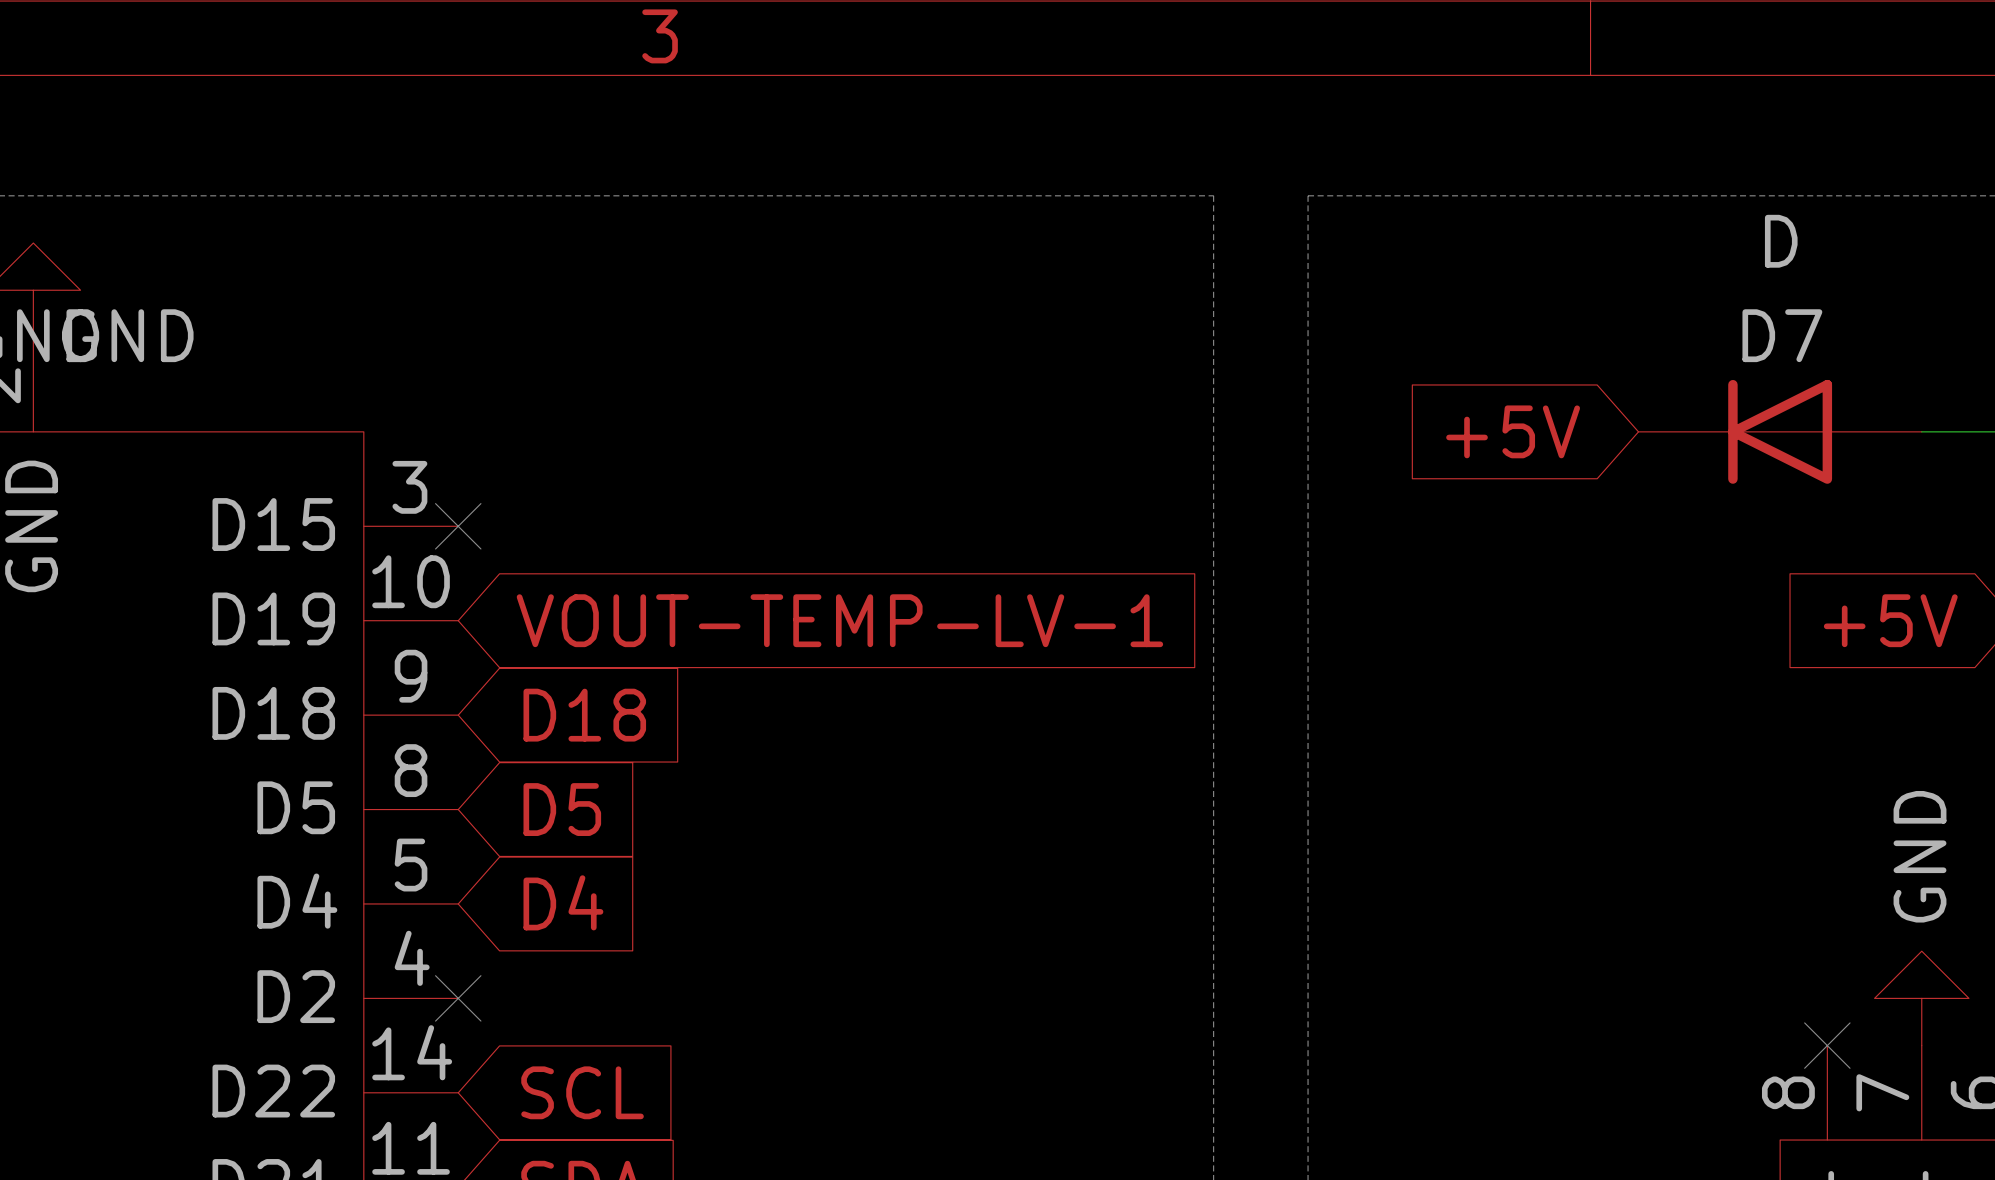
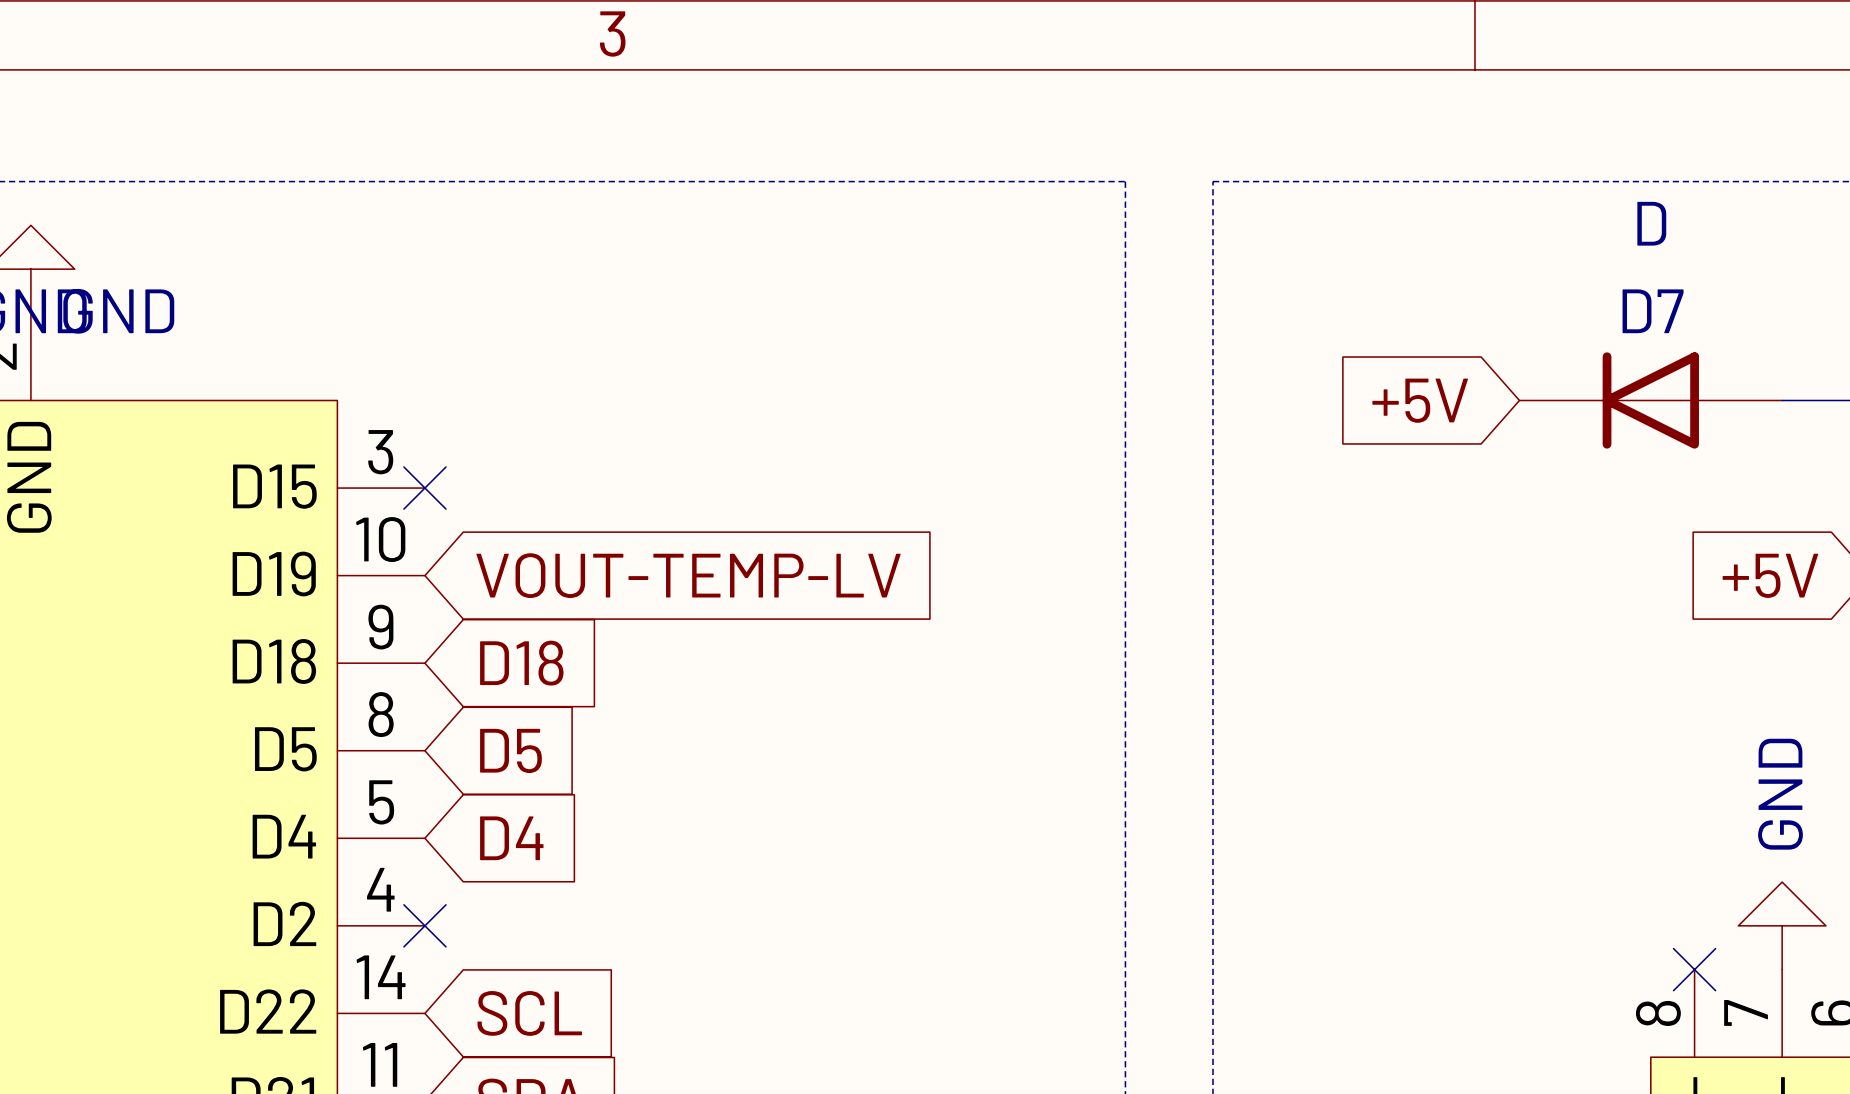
global label: VOUT-TEMP-LV-1 (839, 620) -> VOUT-TEMP-LV (688, 575)

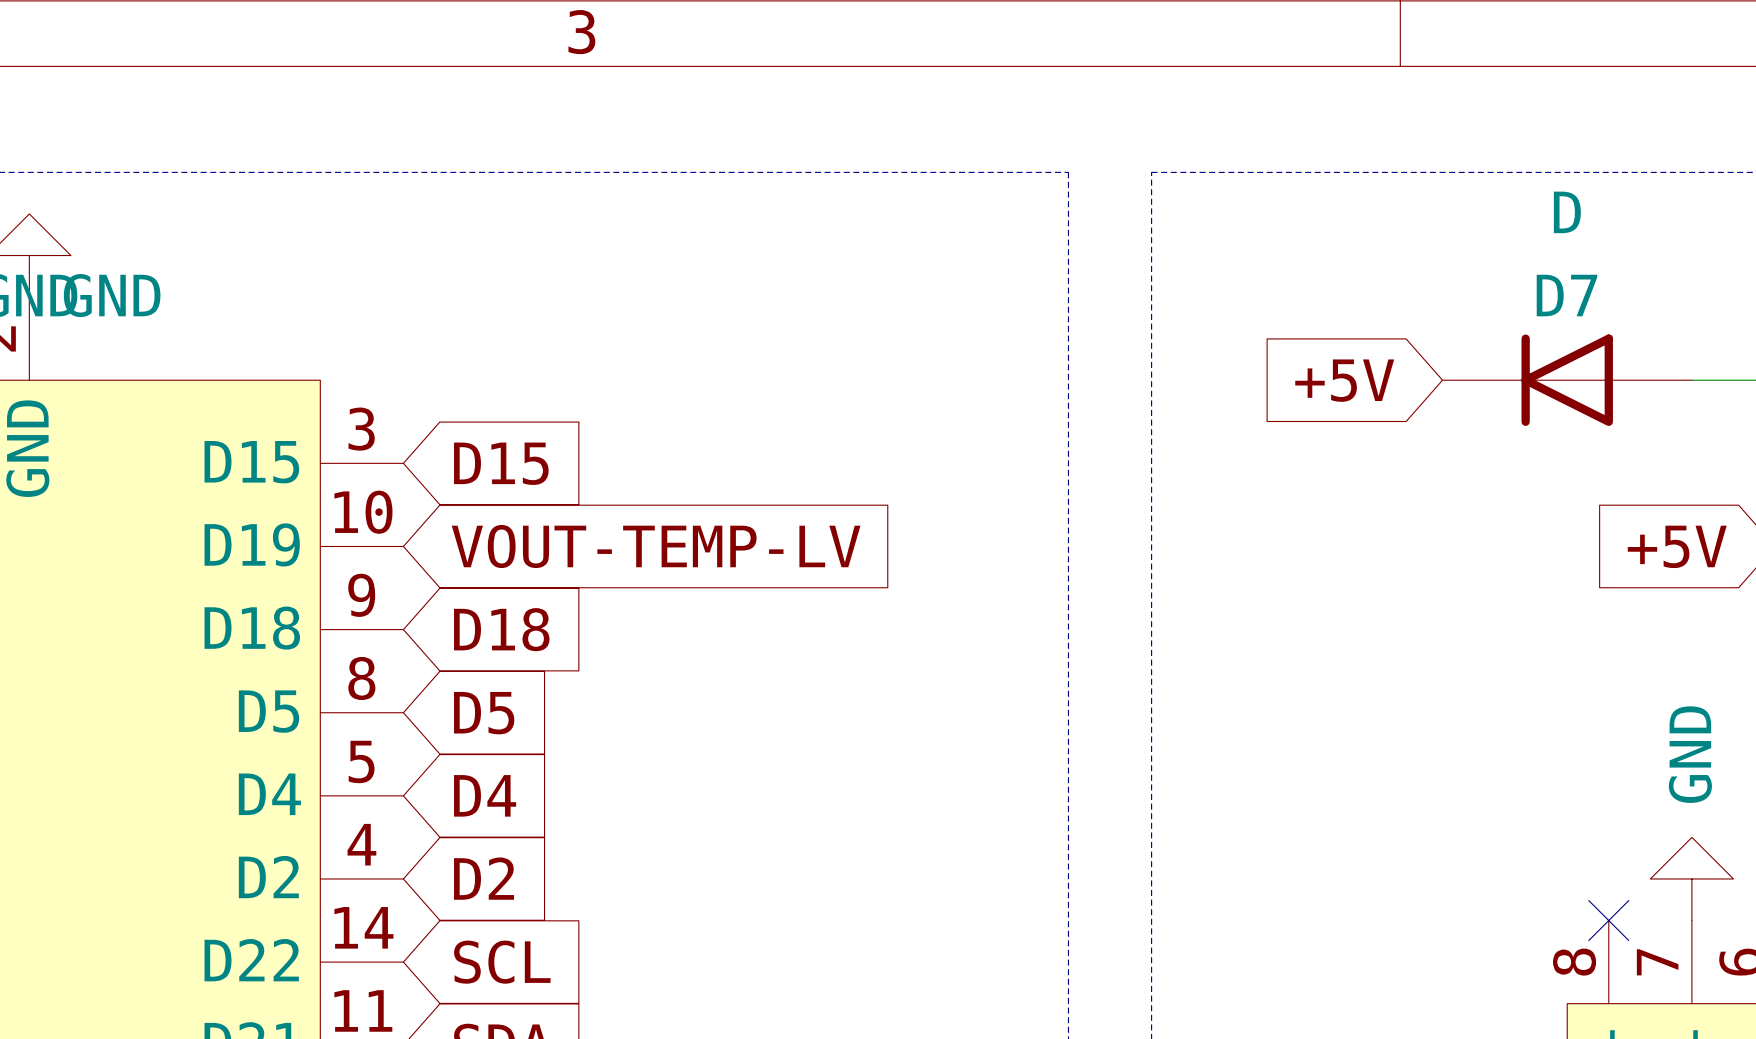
no-connect mark: (424, 488) -> none
global label: none -> D15 (501, 463)
no-connect mark: (424, 925) -> none
global label: none -> D2 (484, 878)

